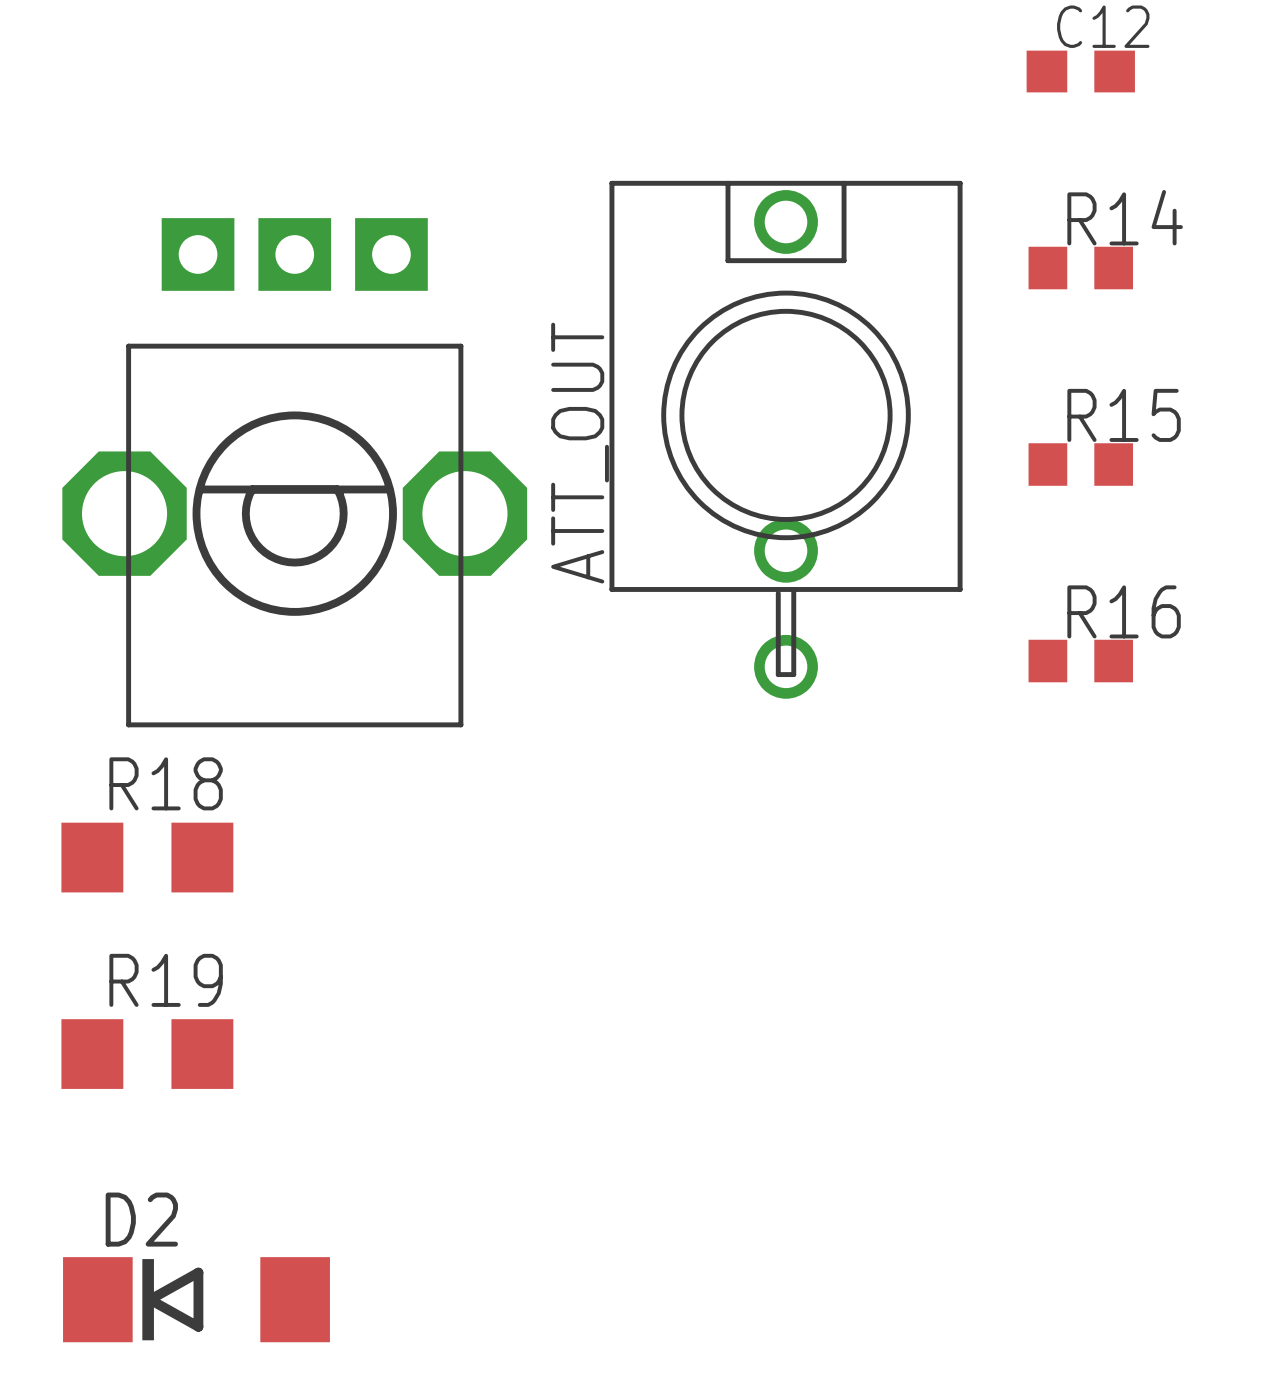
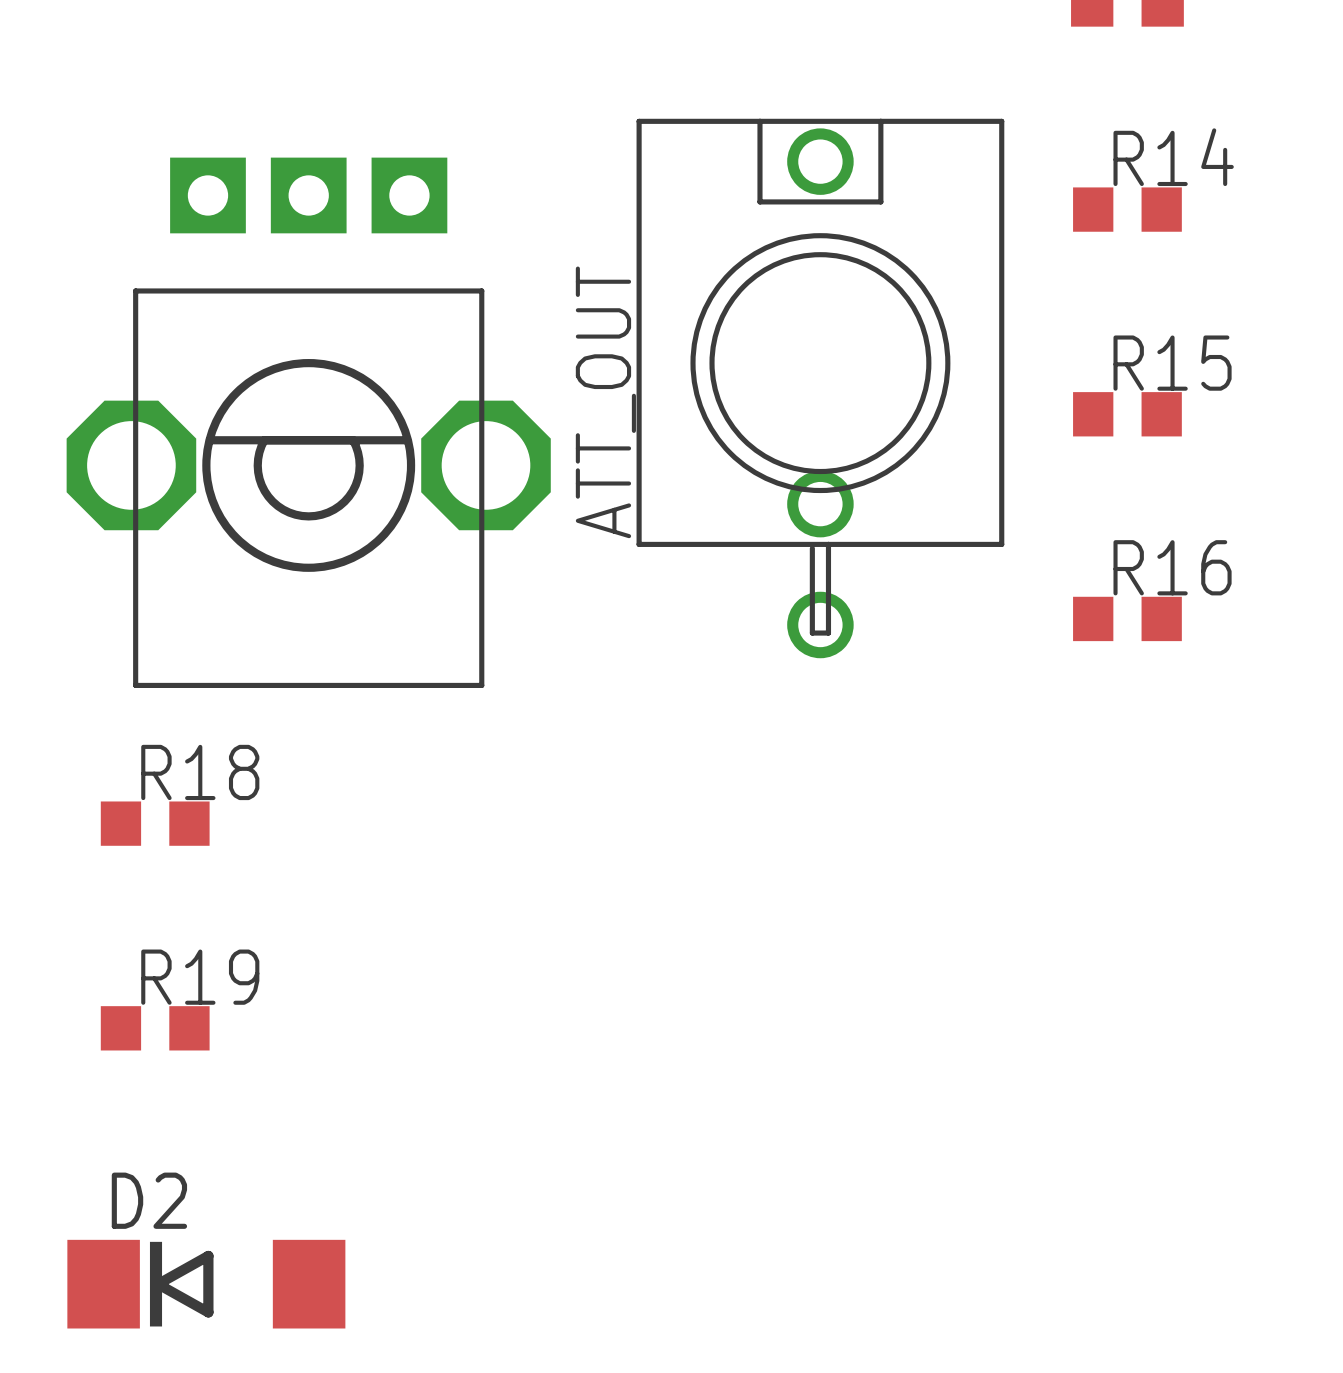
R18 name position: R18 (166, 783) -> R18 (200, 772)
R18 footprint: [61, 822, 234, 893] -> [100, 801, 210, 846]
R19 name position: R19 (166, 980) -> R19 (200, 977)
R19 footprint: [61, 1019, 234, 1089] -> [100, 1006, 210, 1051]

